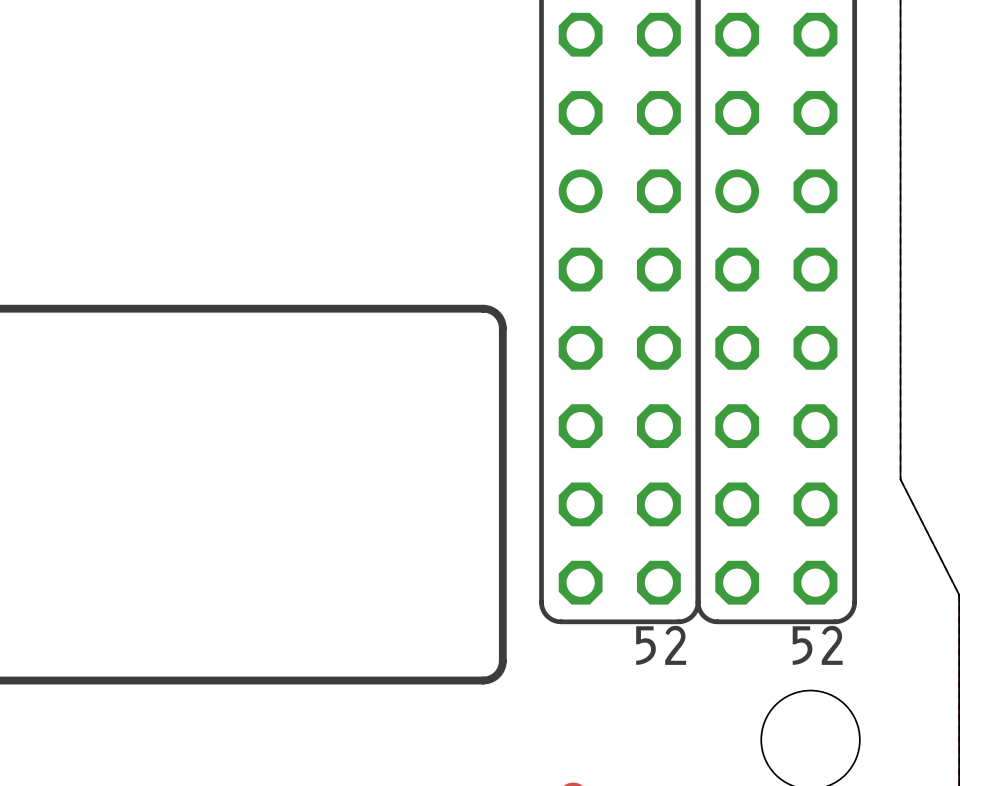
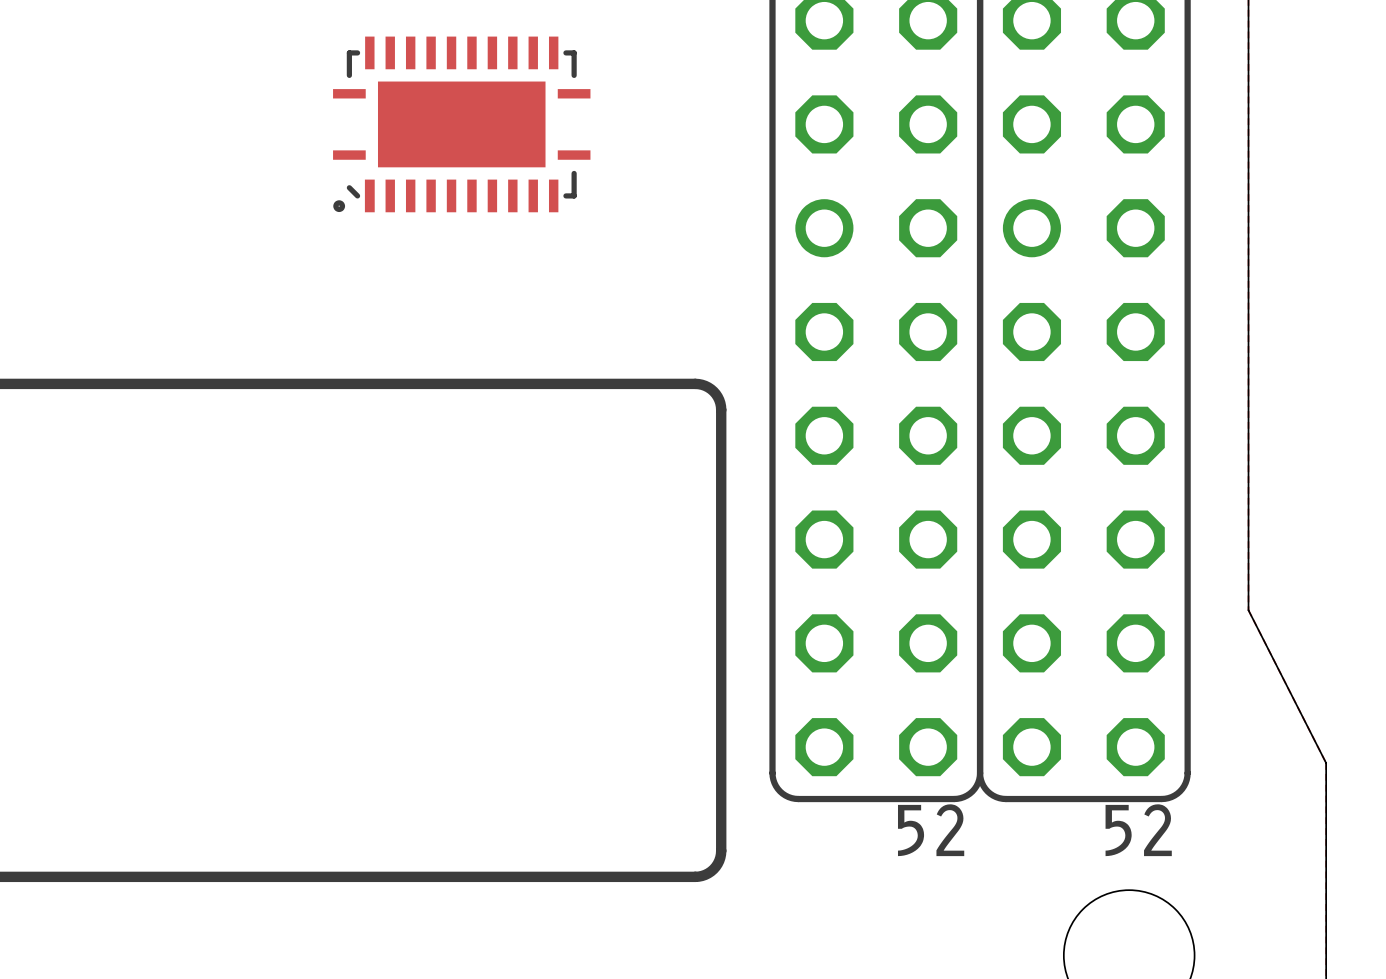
part: none -> (461, 124)

